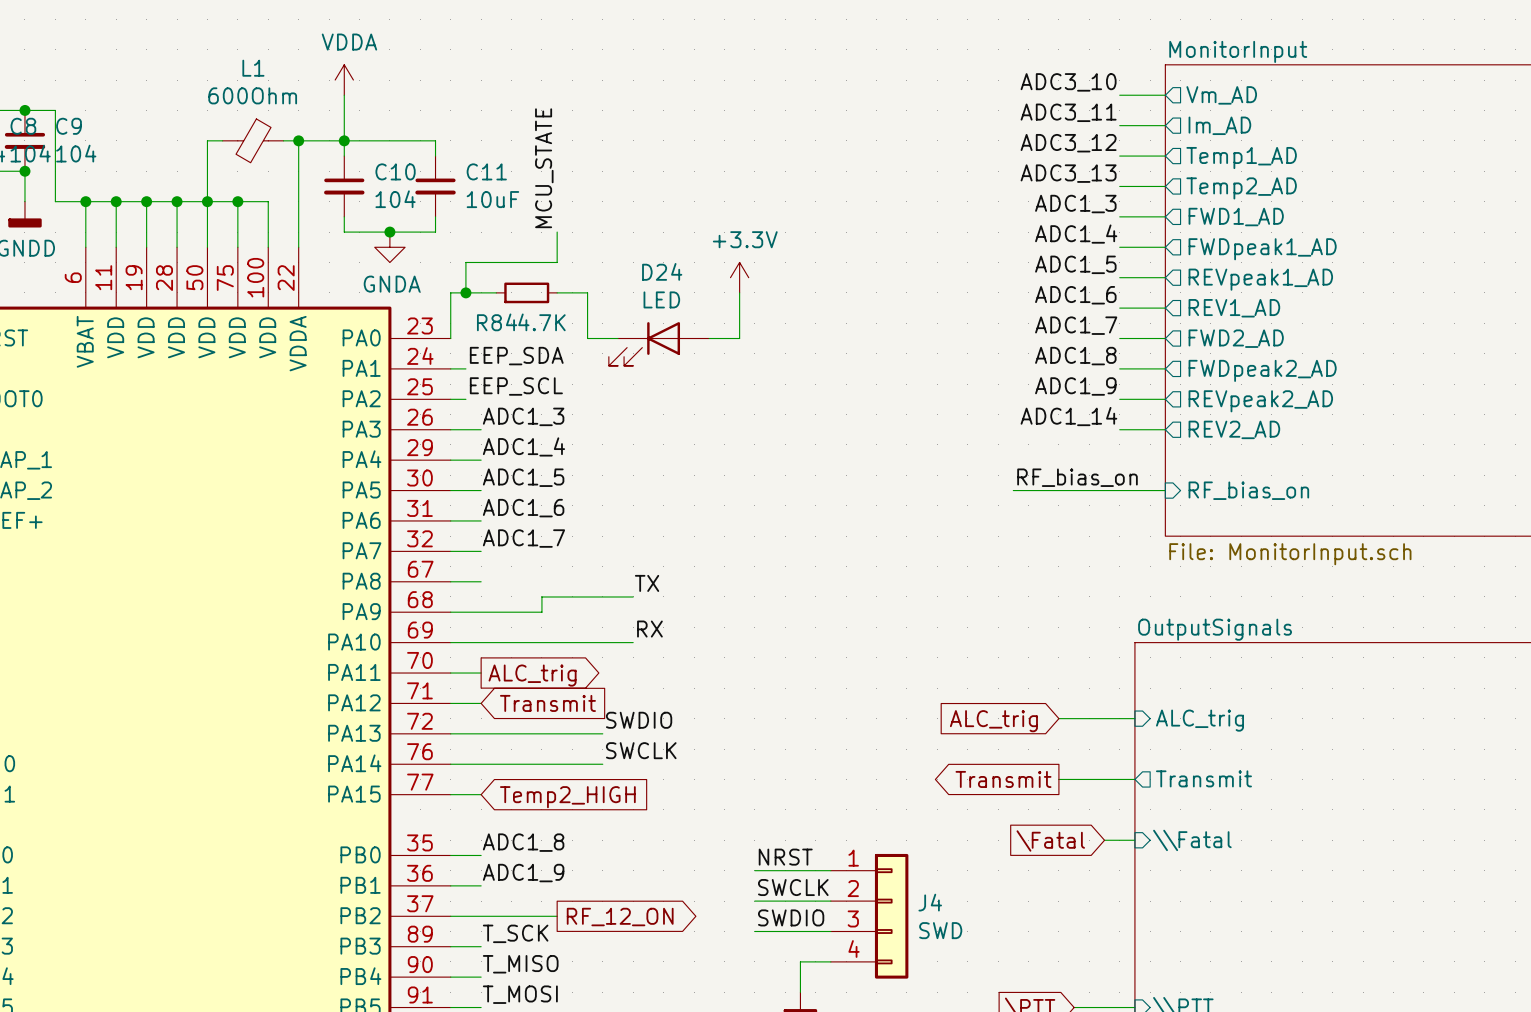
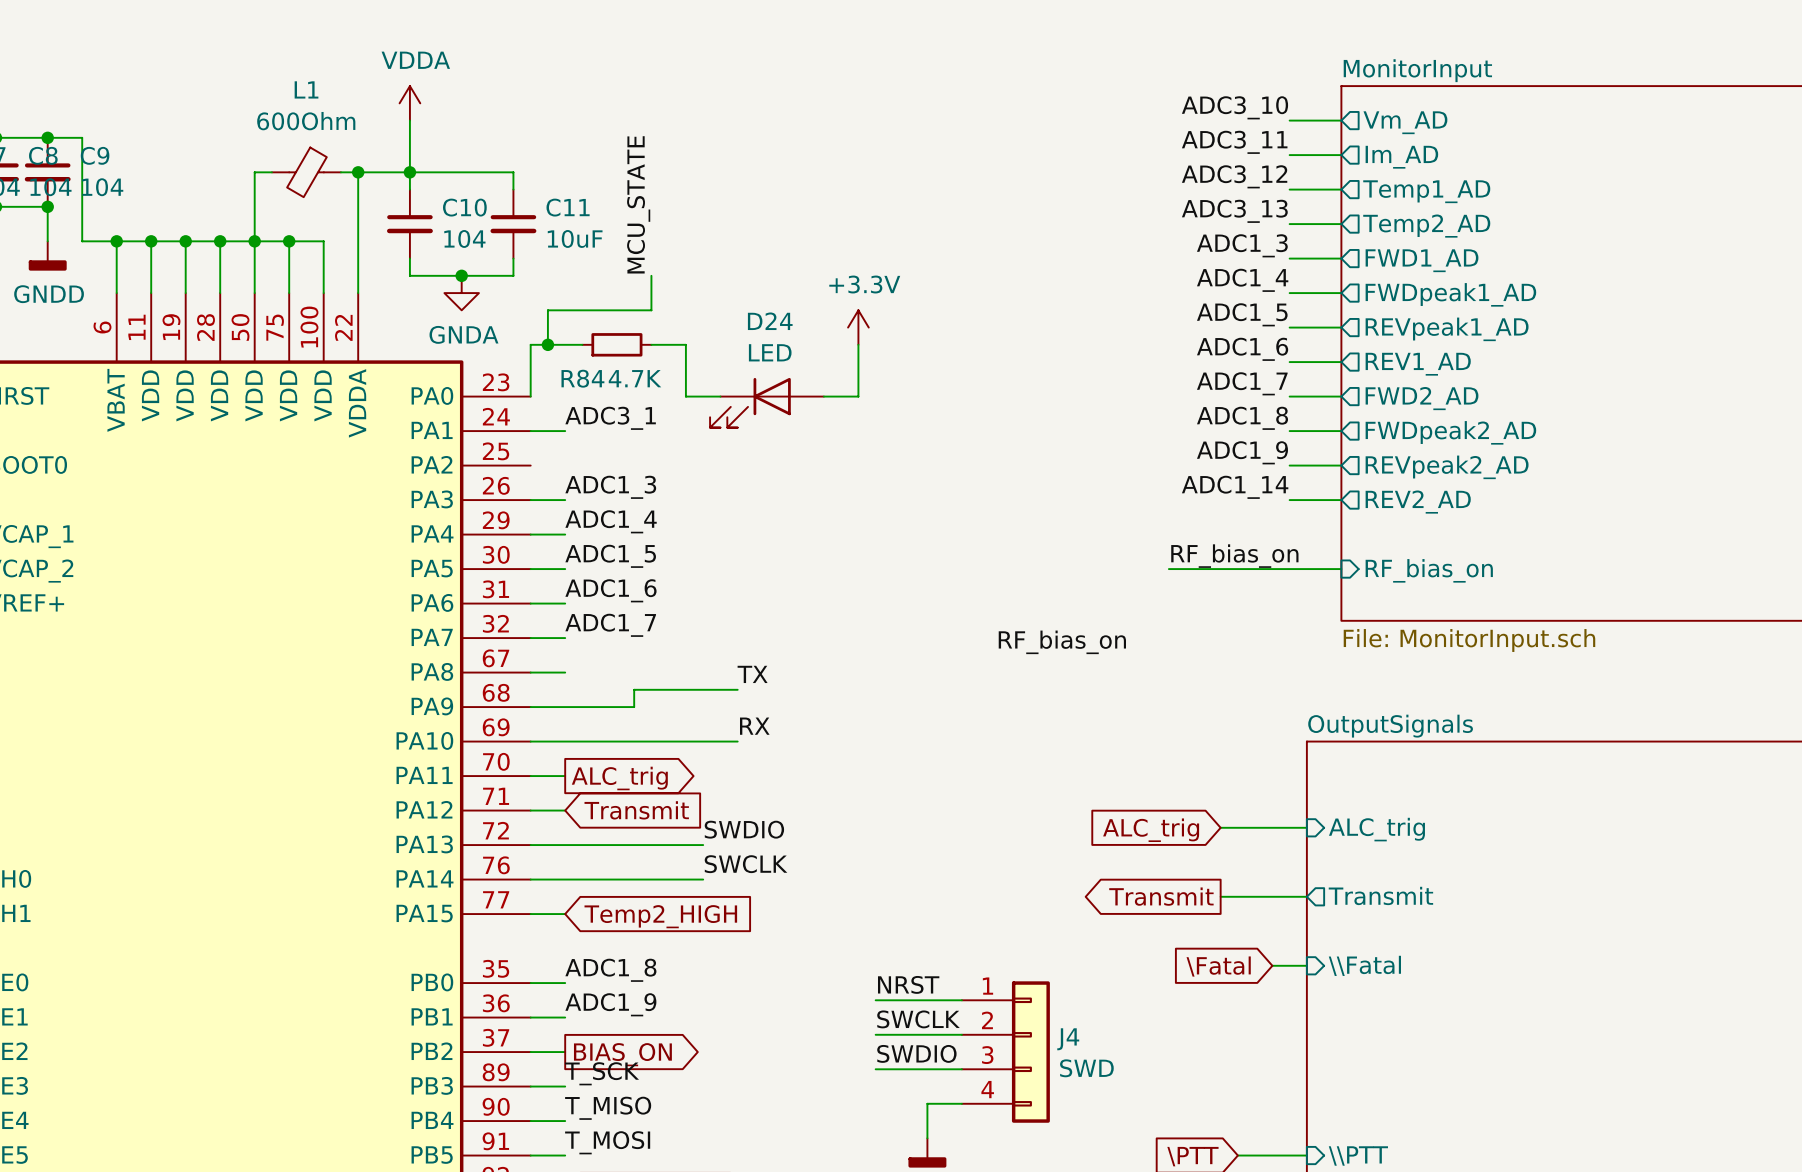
label: EEP_SDA (516, 356) -> none
label: none -> ADC3_1 (610, 418)
label: EEP_SCL (516, 386) -> none
wire: (450, 399) (465, 399) -> (547, 431) (565, 431)
label: none -> RF_bias_on (1062, 642)
wire: (481, 916) (557, 916) -> none
global label: none -> BIAS_ON (622, 1054)
global label: RF_12_ON (620, 917) -> none

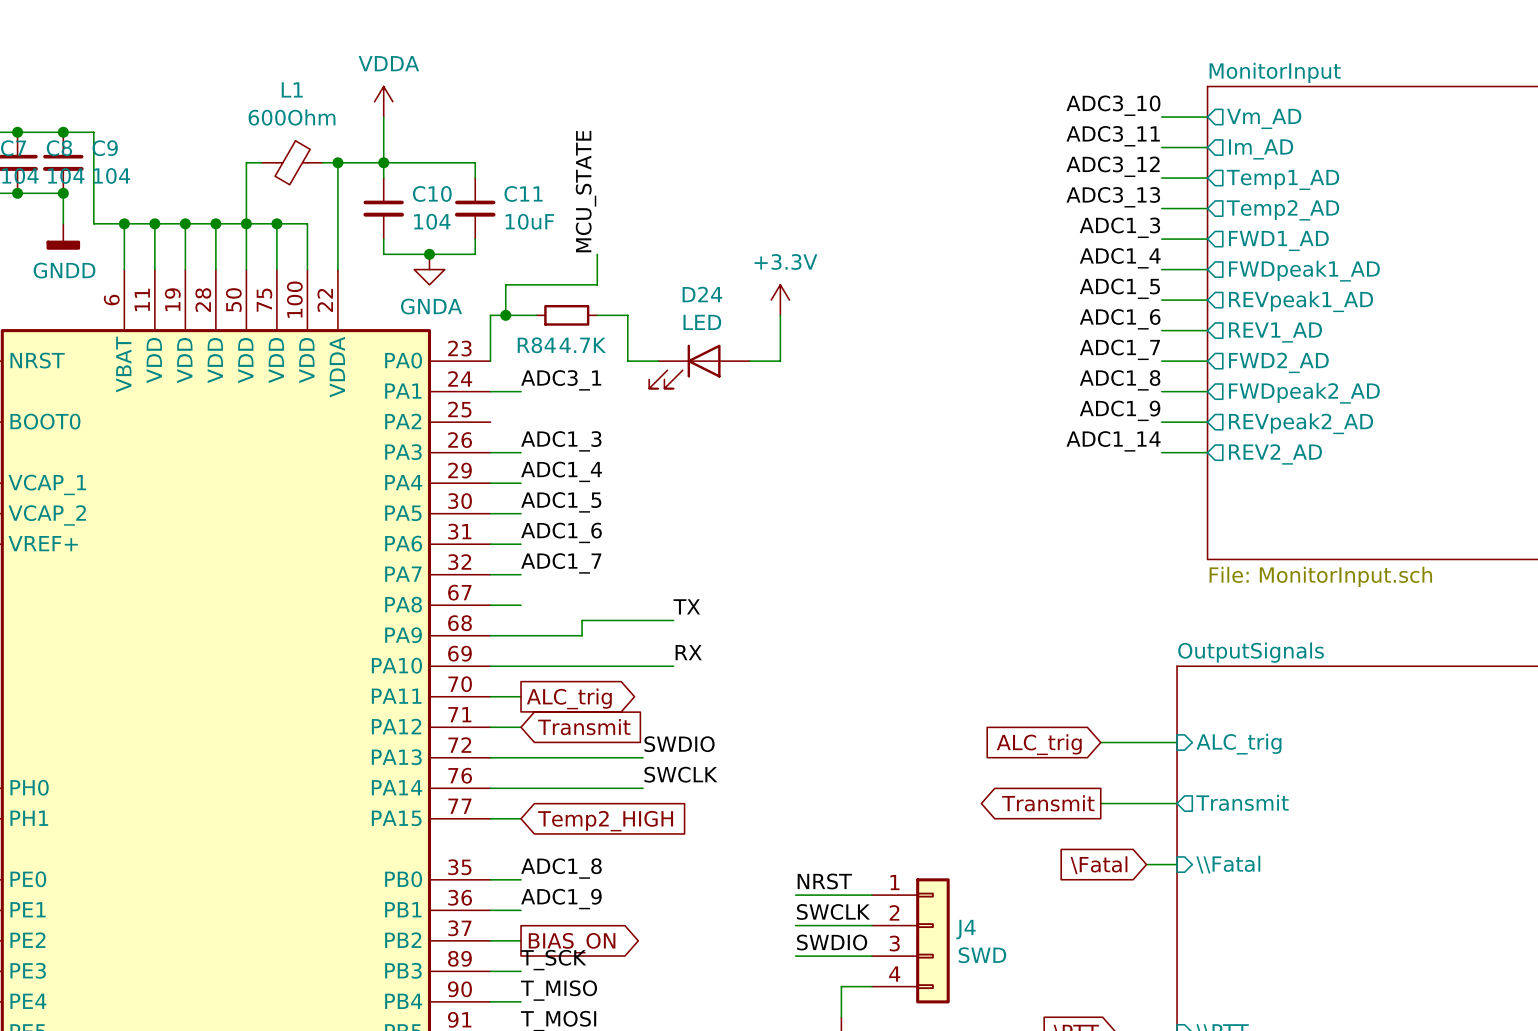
label: RF_bias_on (1234, 556) -> none
wire: (1168, 569) (1341, 569) -> none
sheet pin: RF_bias_on (1429, 570) -> none
label: RF_bias_on (1062, 642) -> none

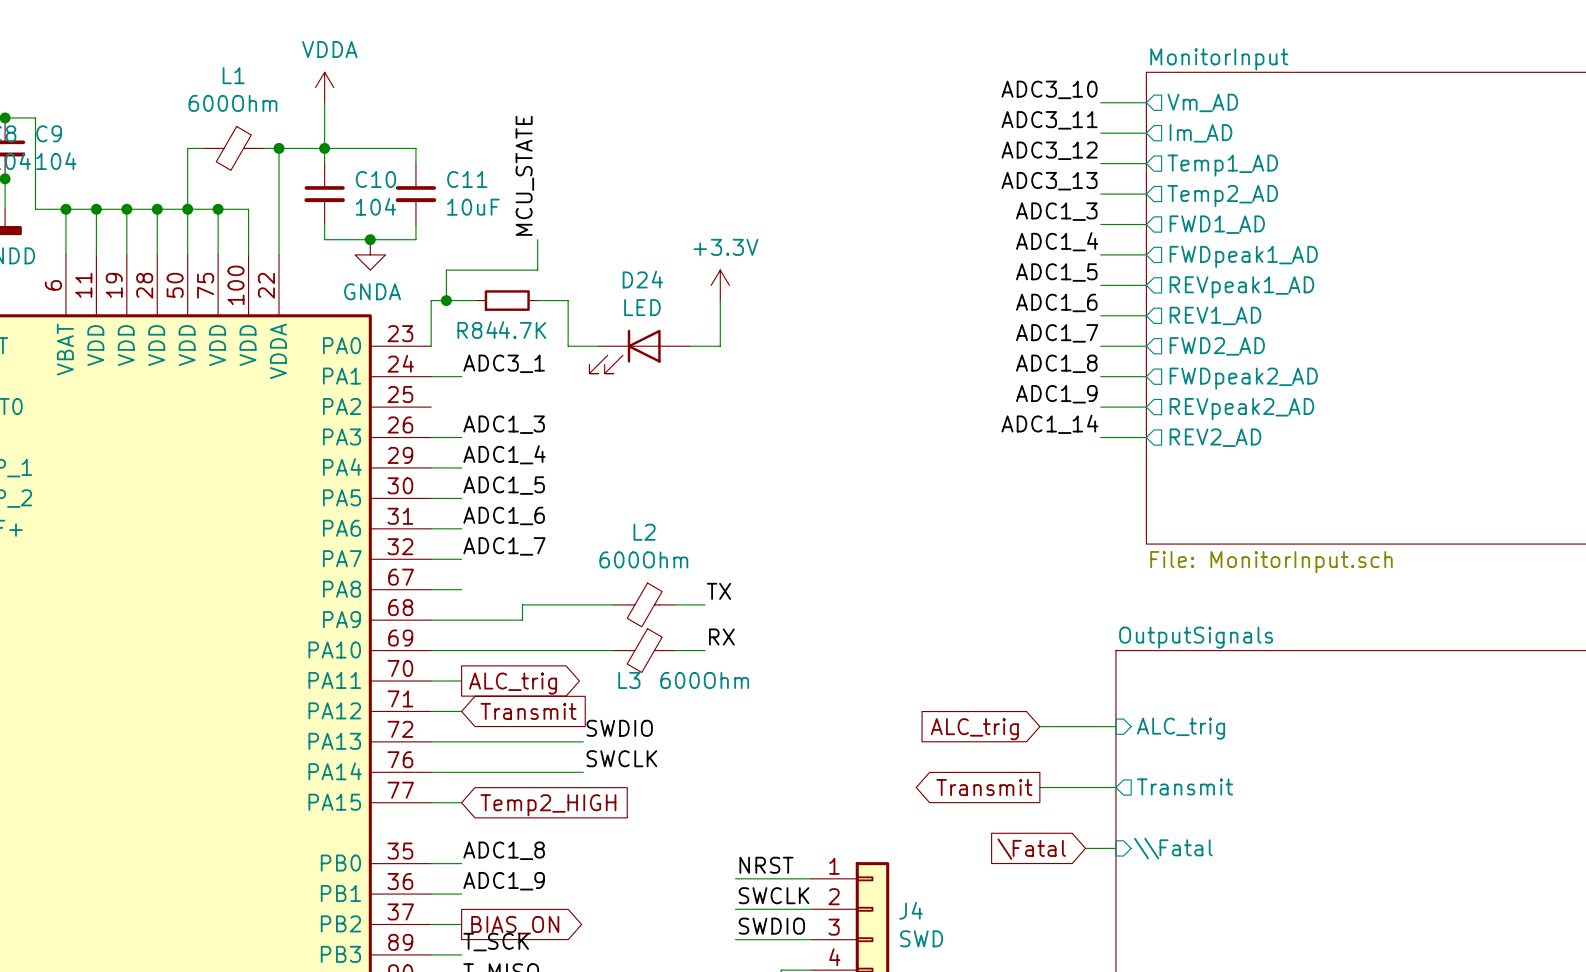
label position: TX (686, 606) -> TX (718, 591)
L2: none -> 600Ohm (644, 604)
wire: none -> (674, 604) (705, 604)
label position: RX (688, 652) -> RX (721, 637)
L3: none -> 600Ohm (644, 650)
wire: none -> (674, 650) (705, 650)

